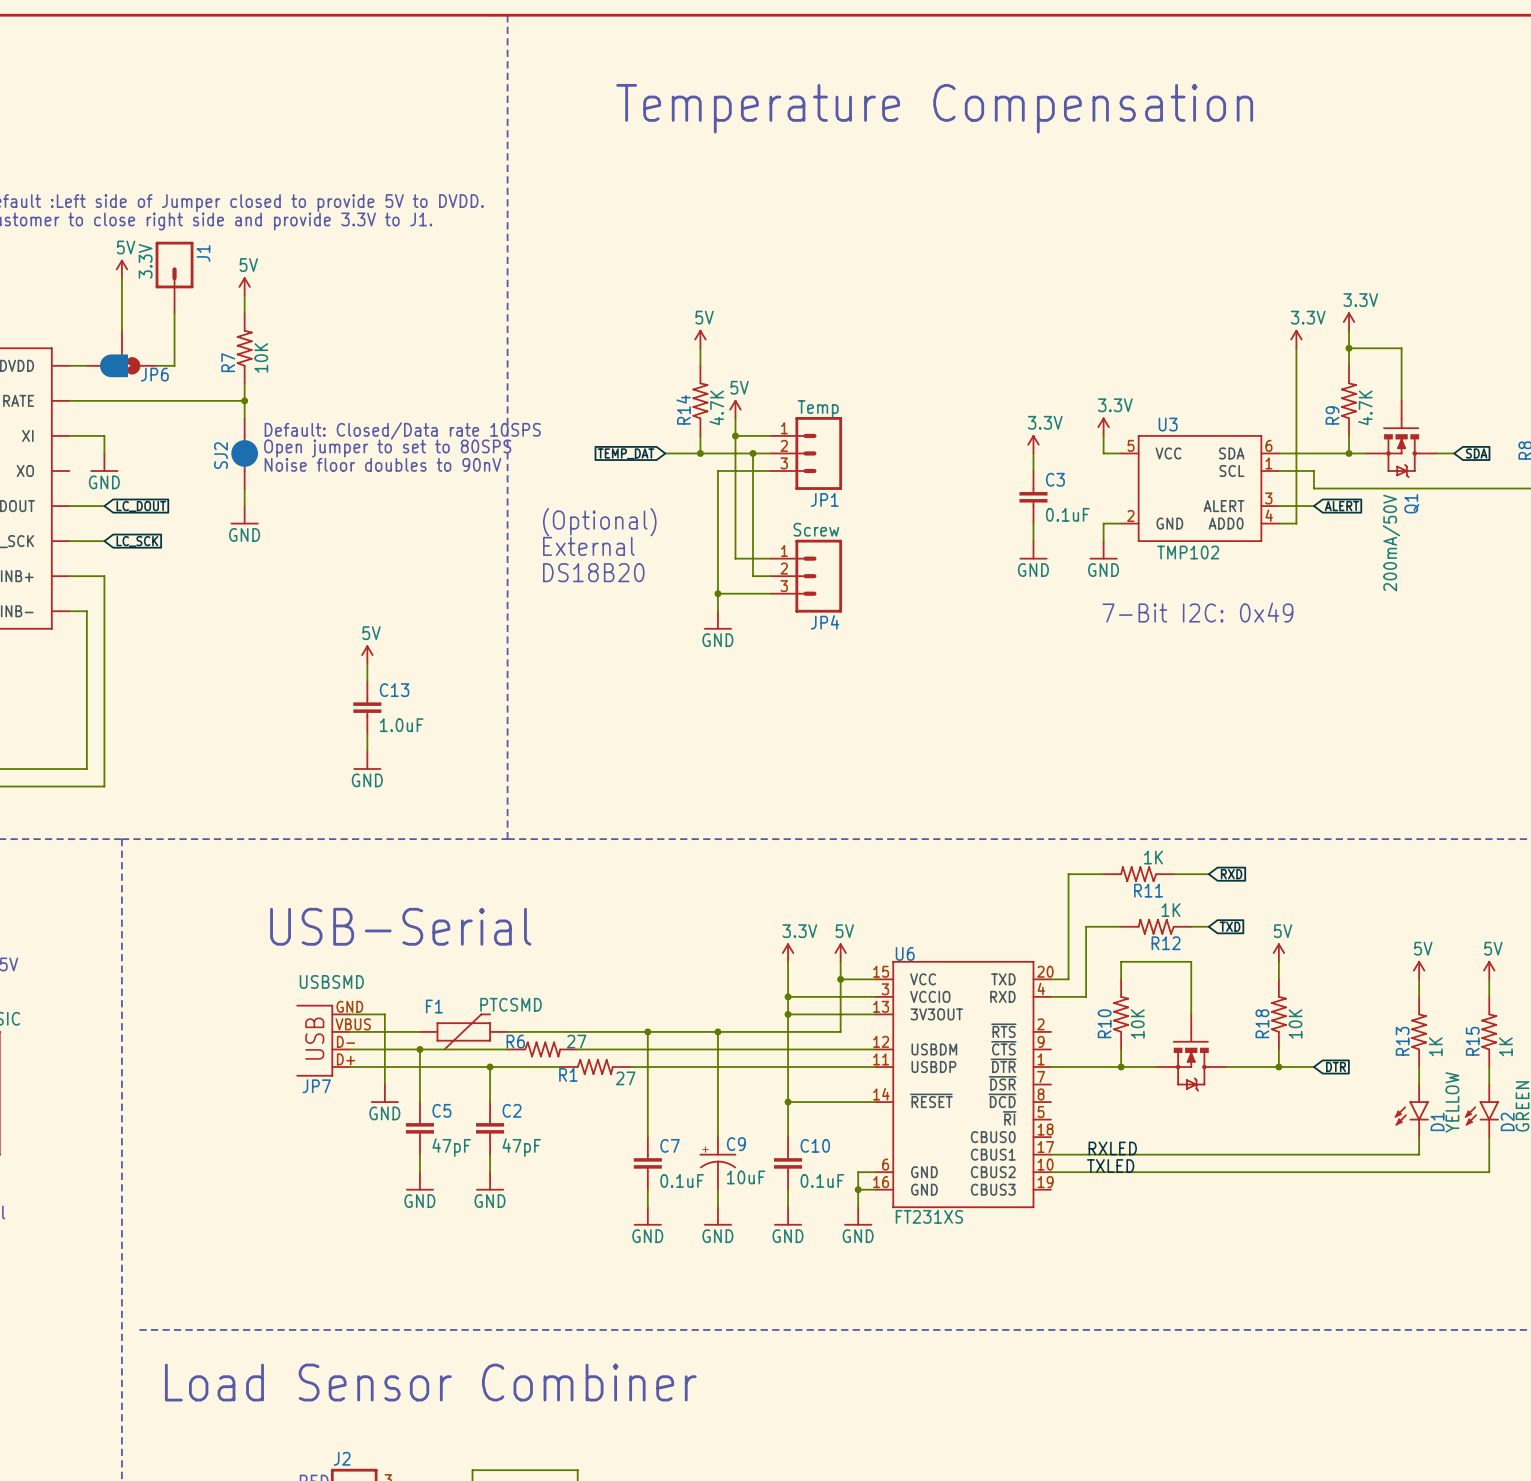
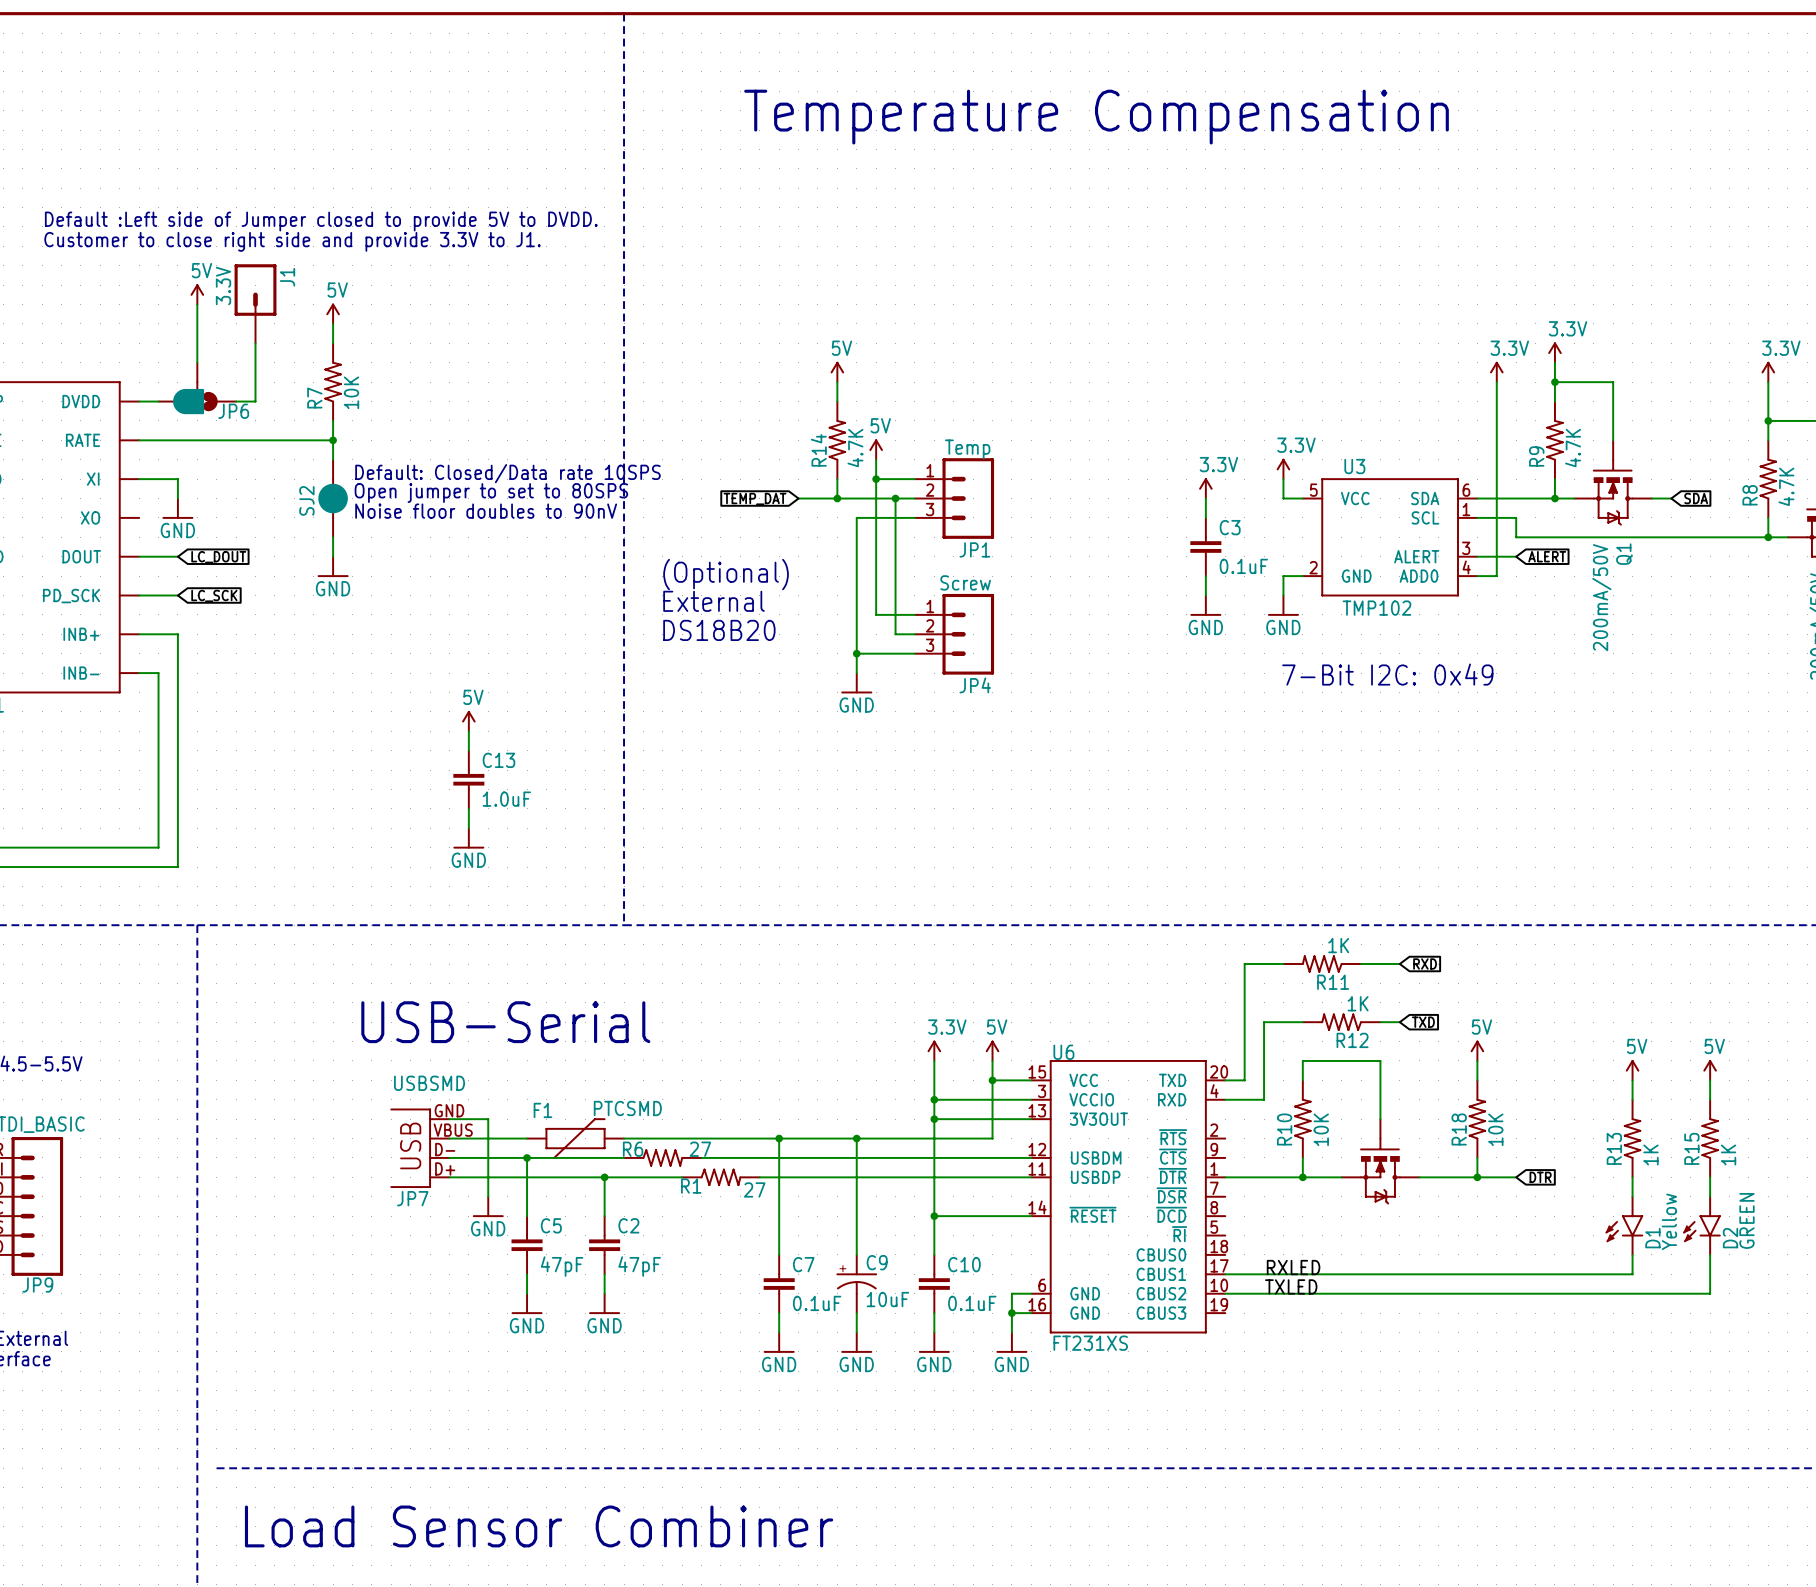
D1 value: YELLOW (1452, 1102) -> Yellow (1669, 1221)

